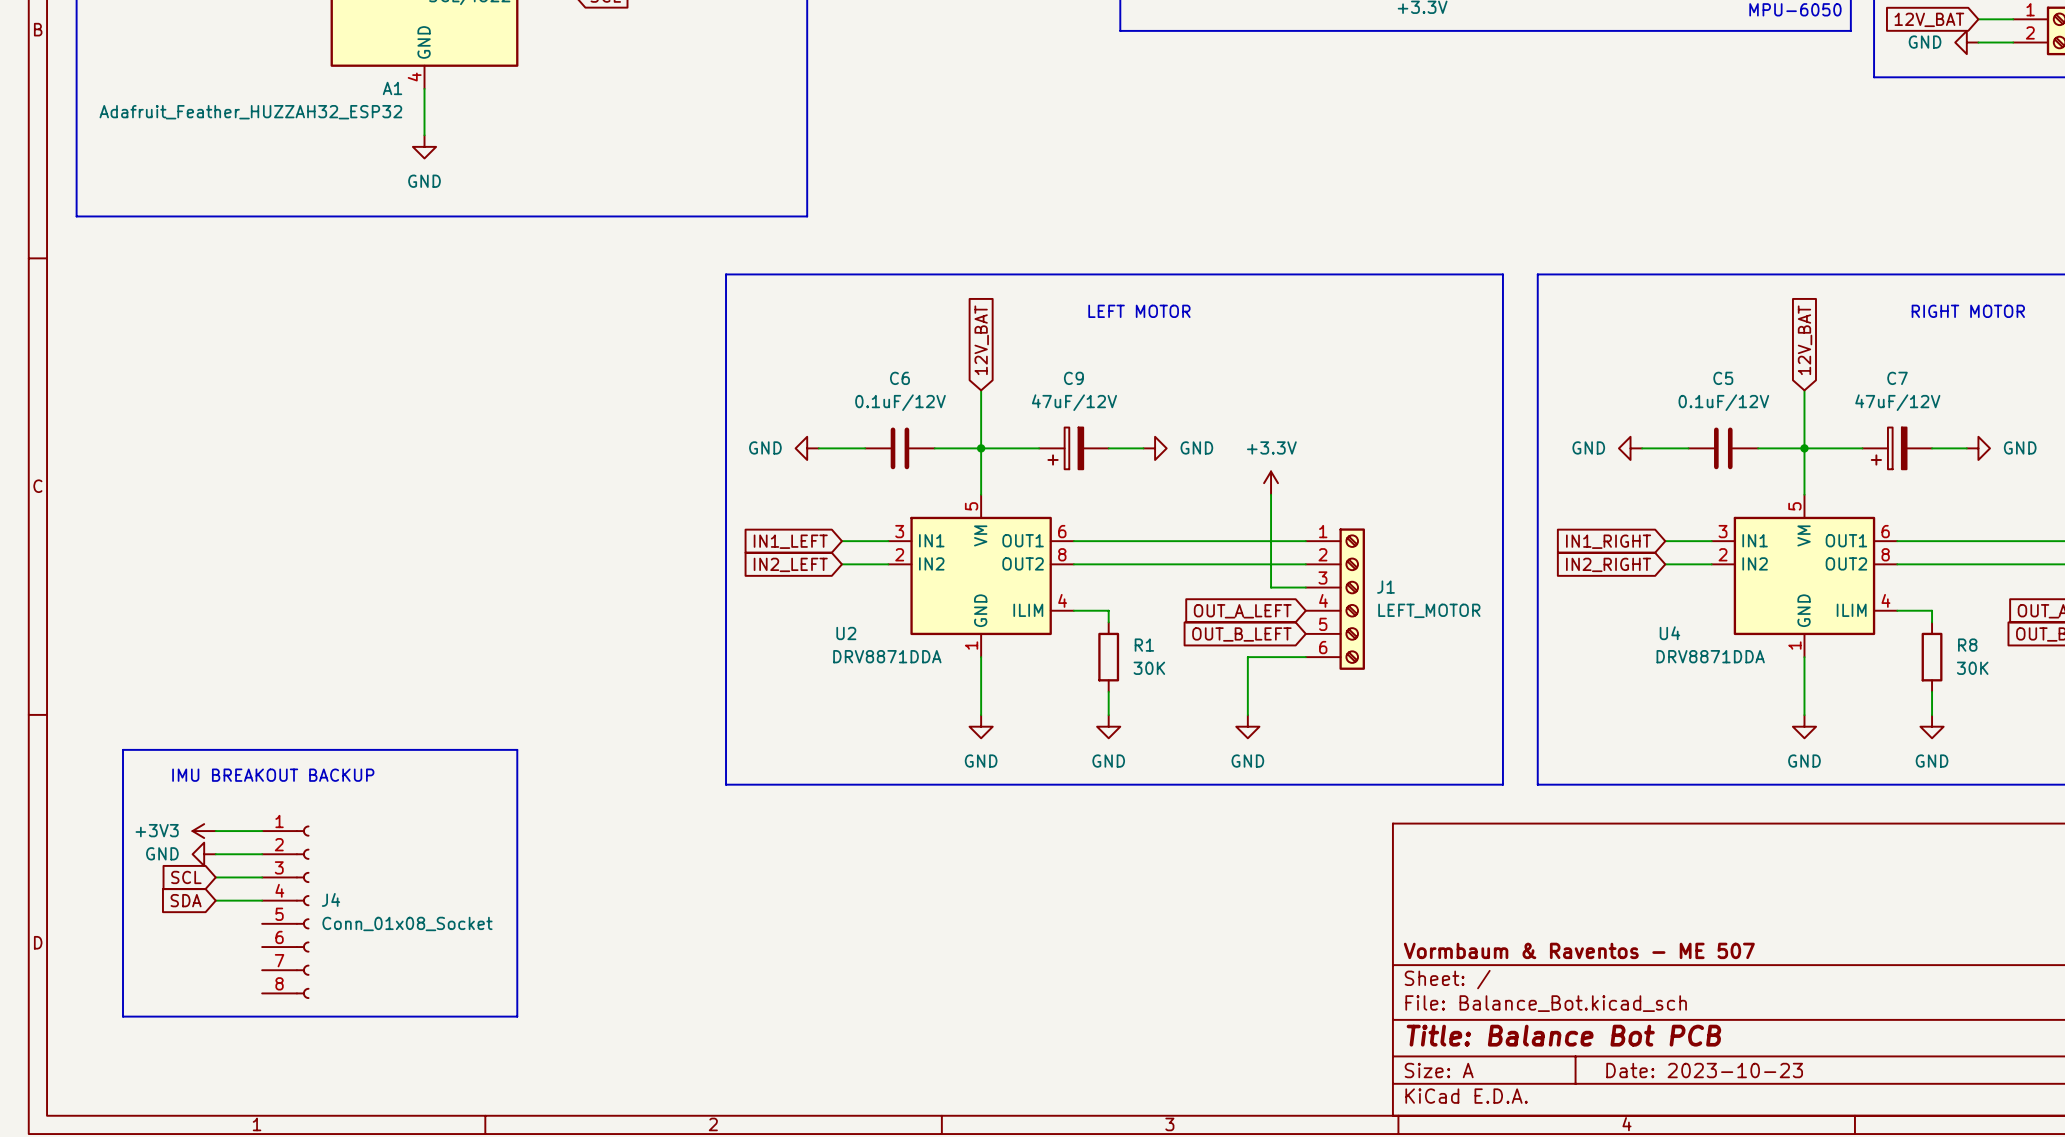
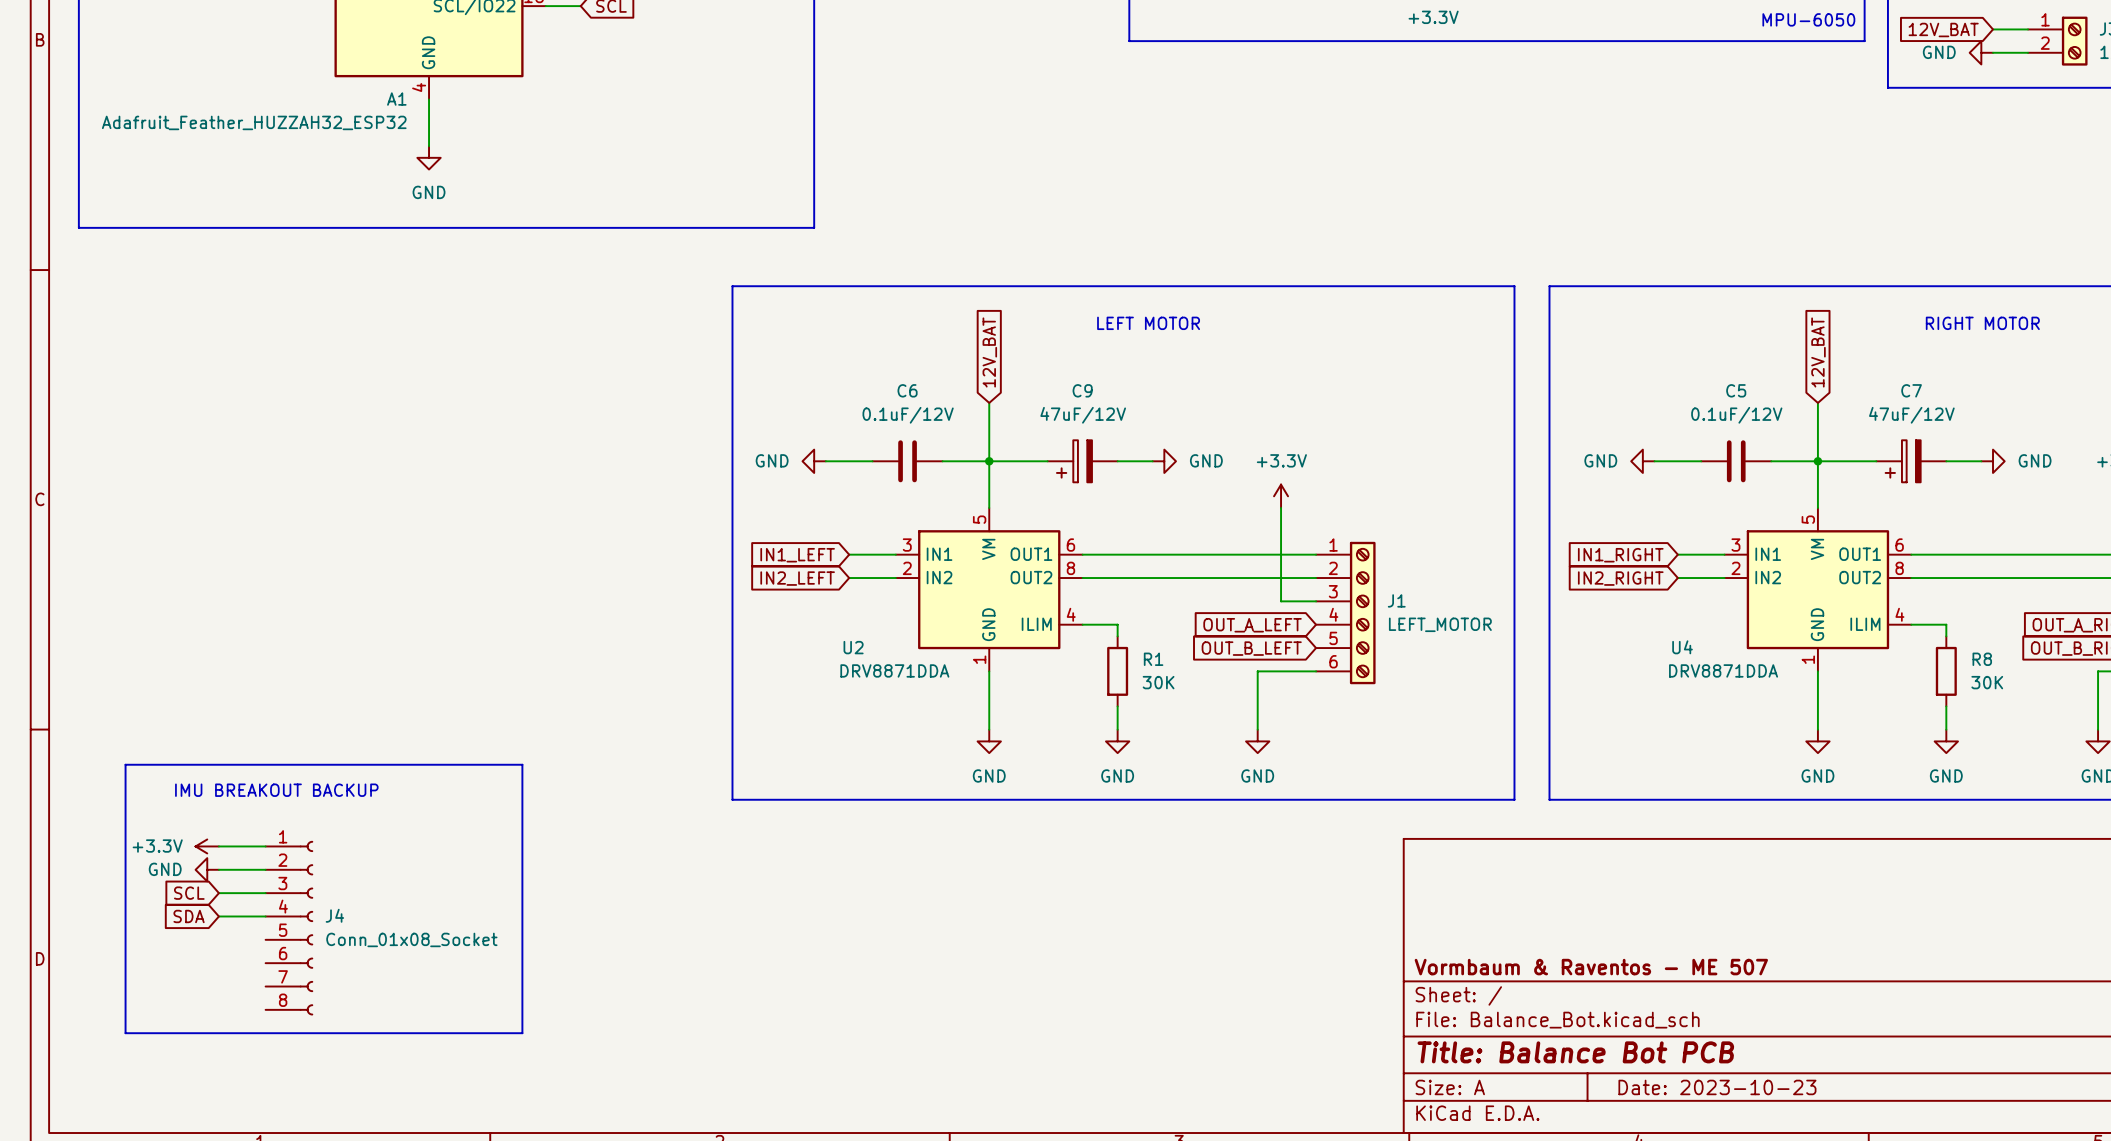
power symbol: +3V3 (204, 831) -> +3.3V (207, 846)

